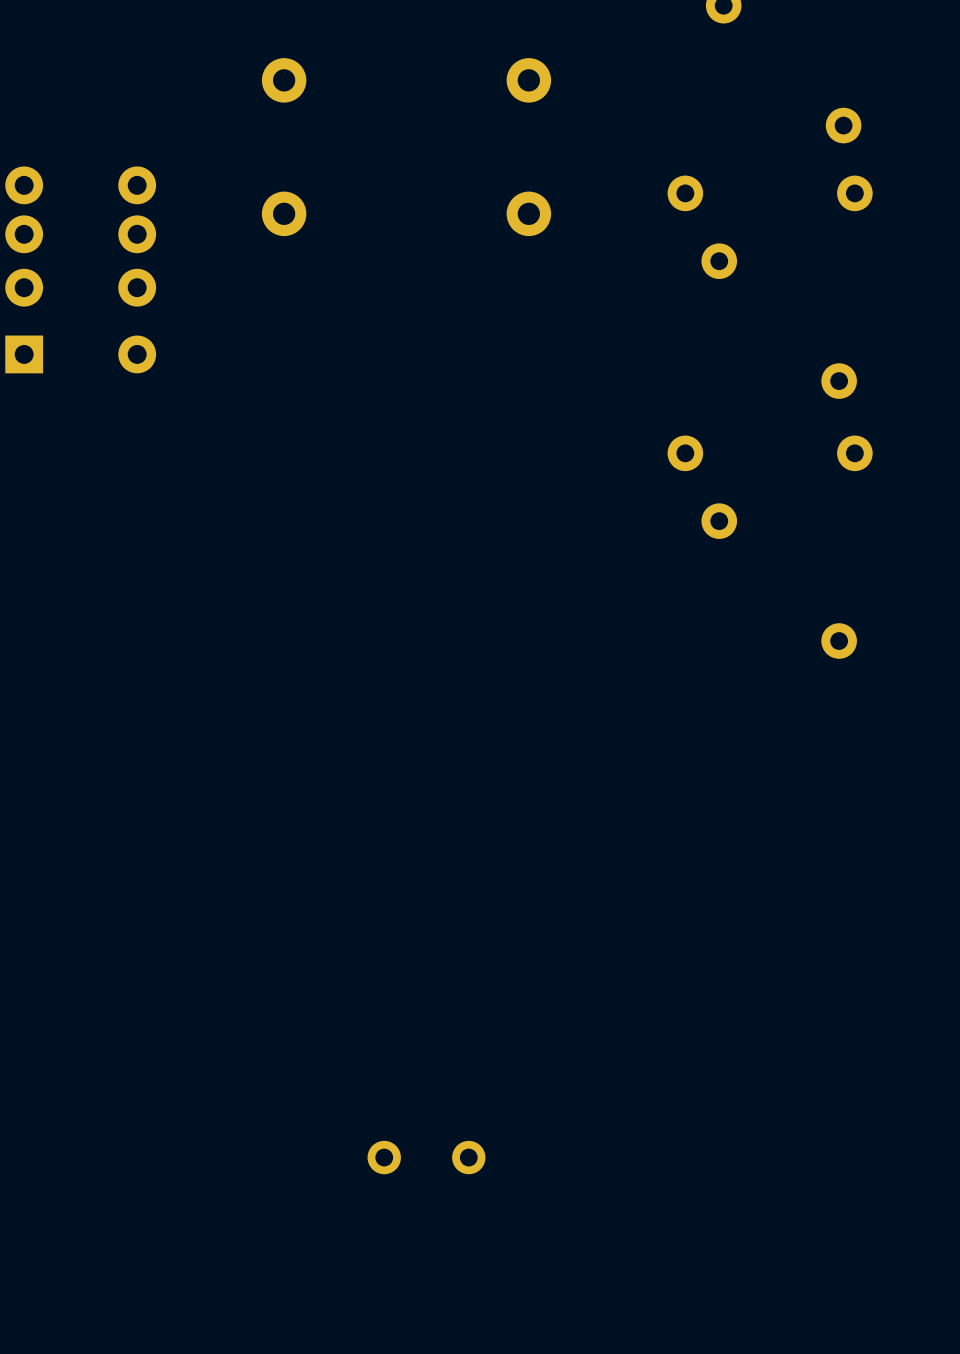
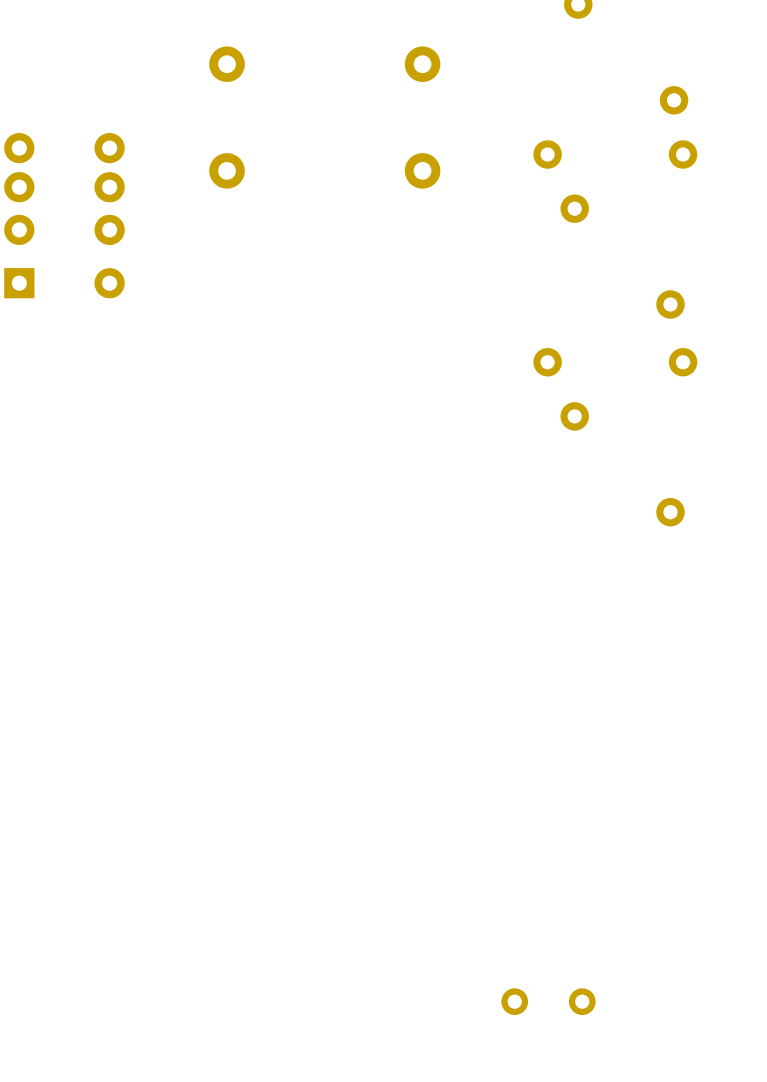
part position: (426, 1157) -> (548, 1001)

